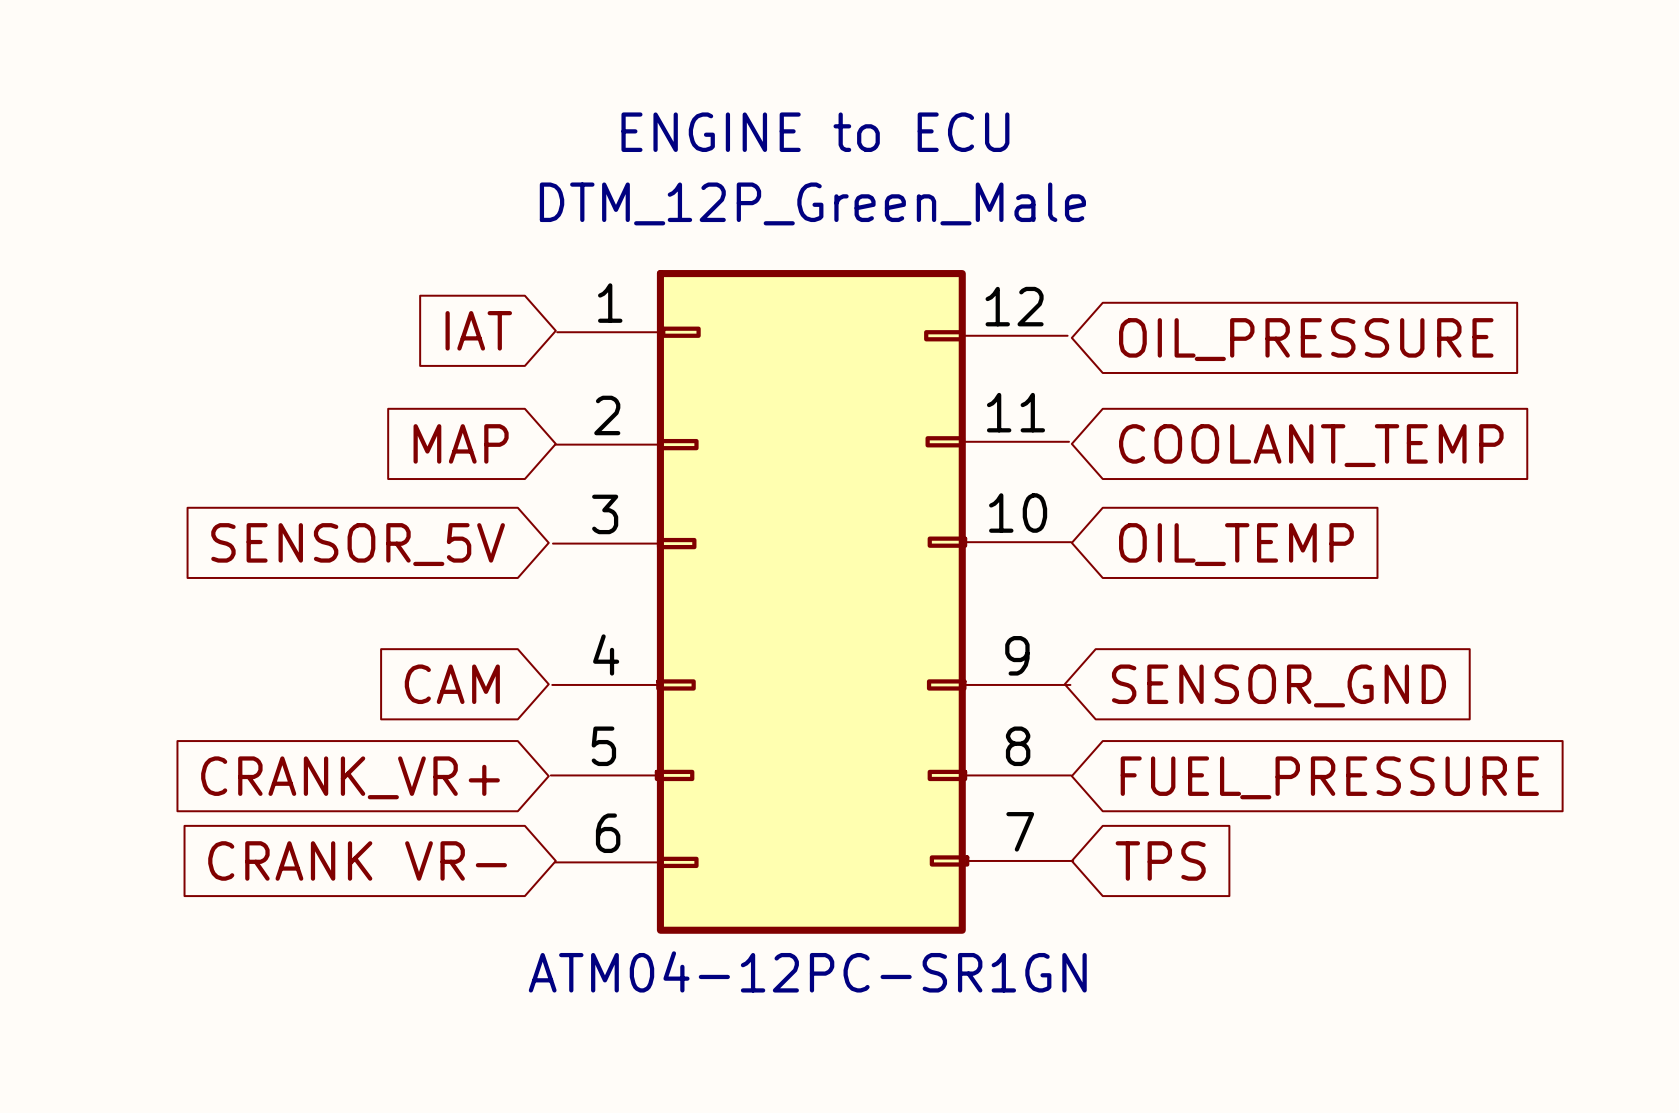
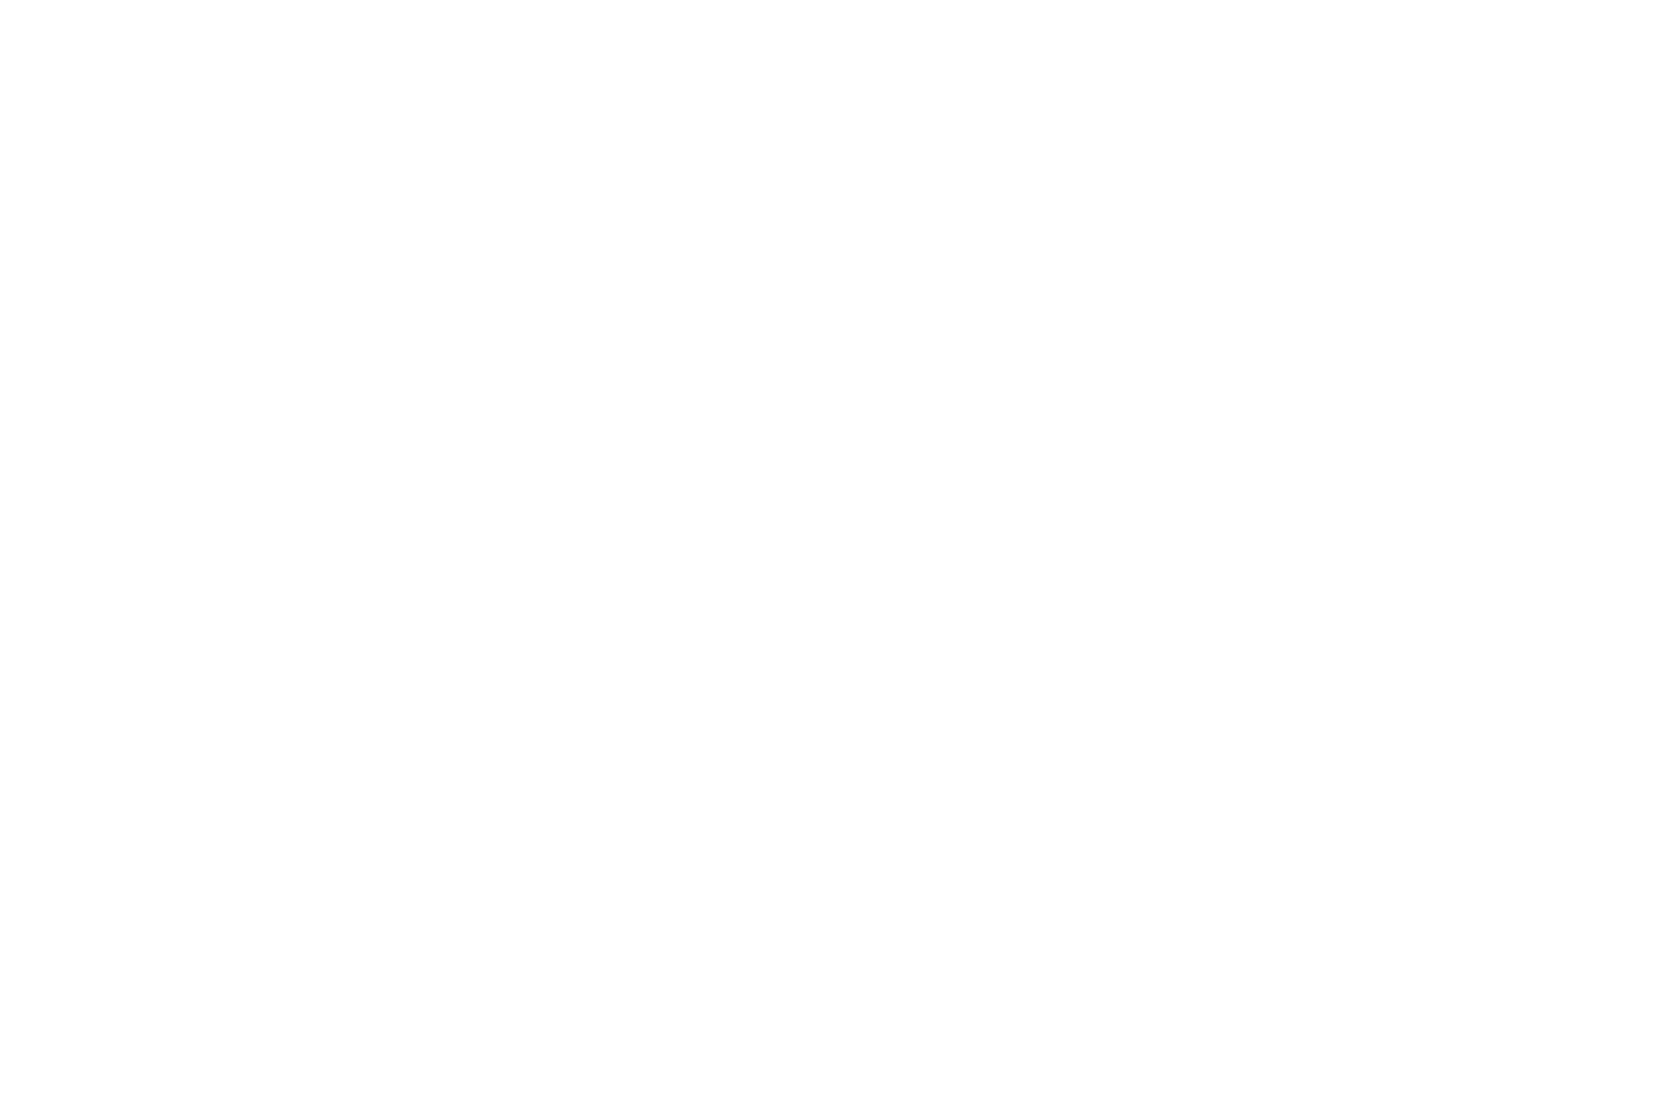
text: ENGINE to ECU (815, 132) -> none
global label: IAT (478, 330) -> none
global label: OIL_PRESSURE (1306, 339) -> none
global label: MAP (461, 443) -> none
global label: COOLANT_TEMP (1311, 445) -> none
global label: SENSOR_5V (358, 544) -> none
global label: OIL_TEMP (1236, 544) -> none
part: DTM_12P_Green_Male (812, 601) -> none
global label: CAM (452, 684) -> none
global label: SENSOR_GND (1278, 685) -> none
global label: CRANK_VR+ (350, 777) -> none
global label: FUEL_PRESSURE (1329, 777) -> none
global label: CRANK VR- (357, 860) -> none
global label: TPS (1160, 860) -> none

